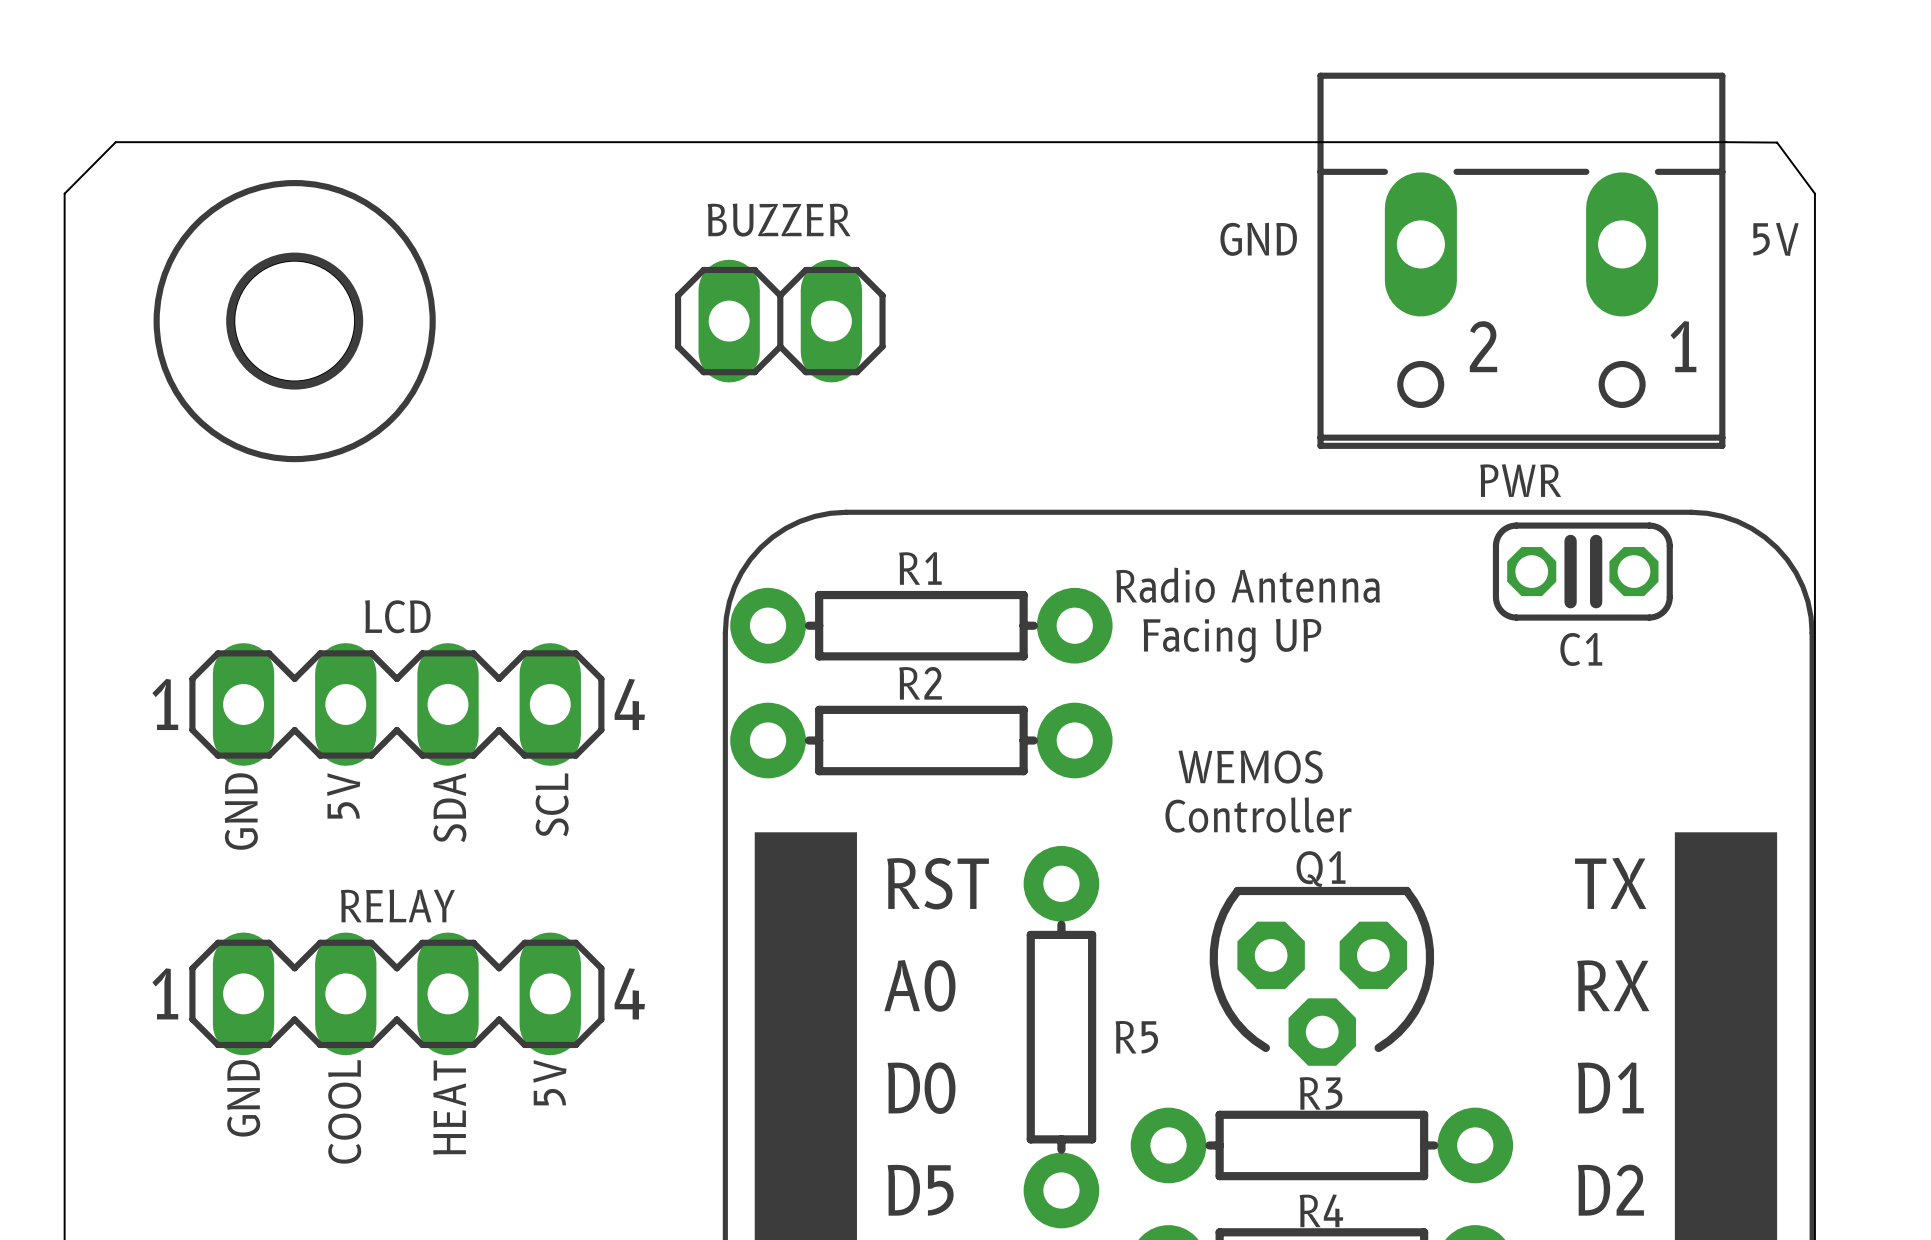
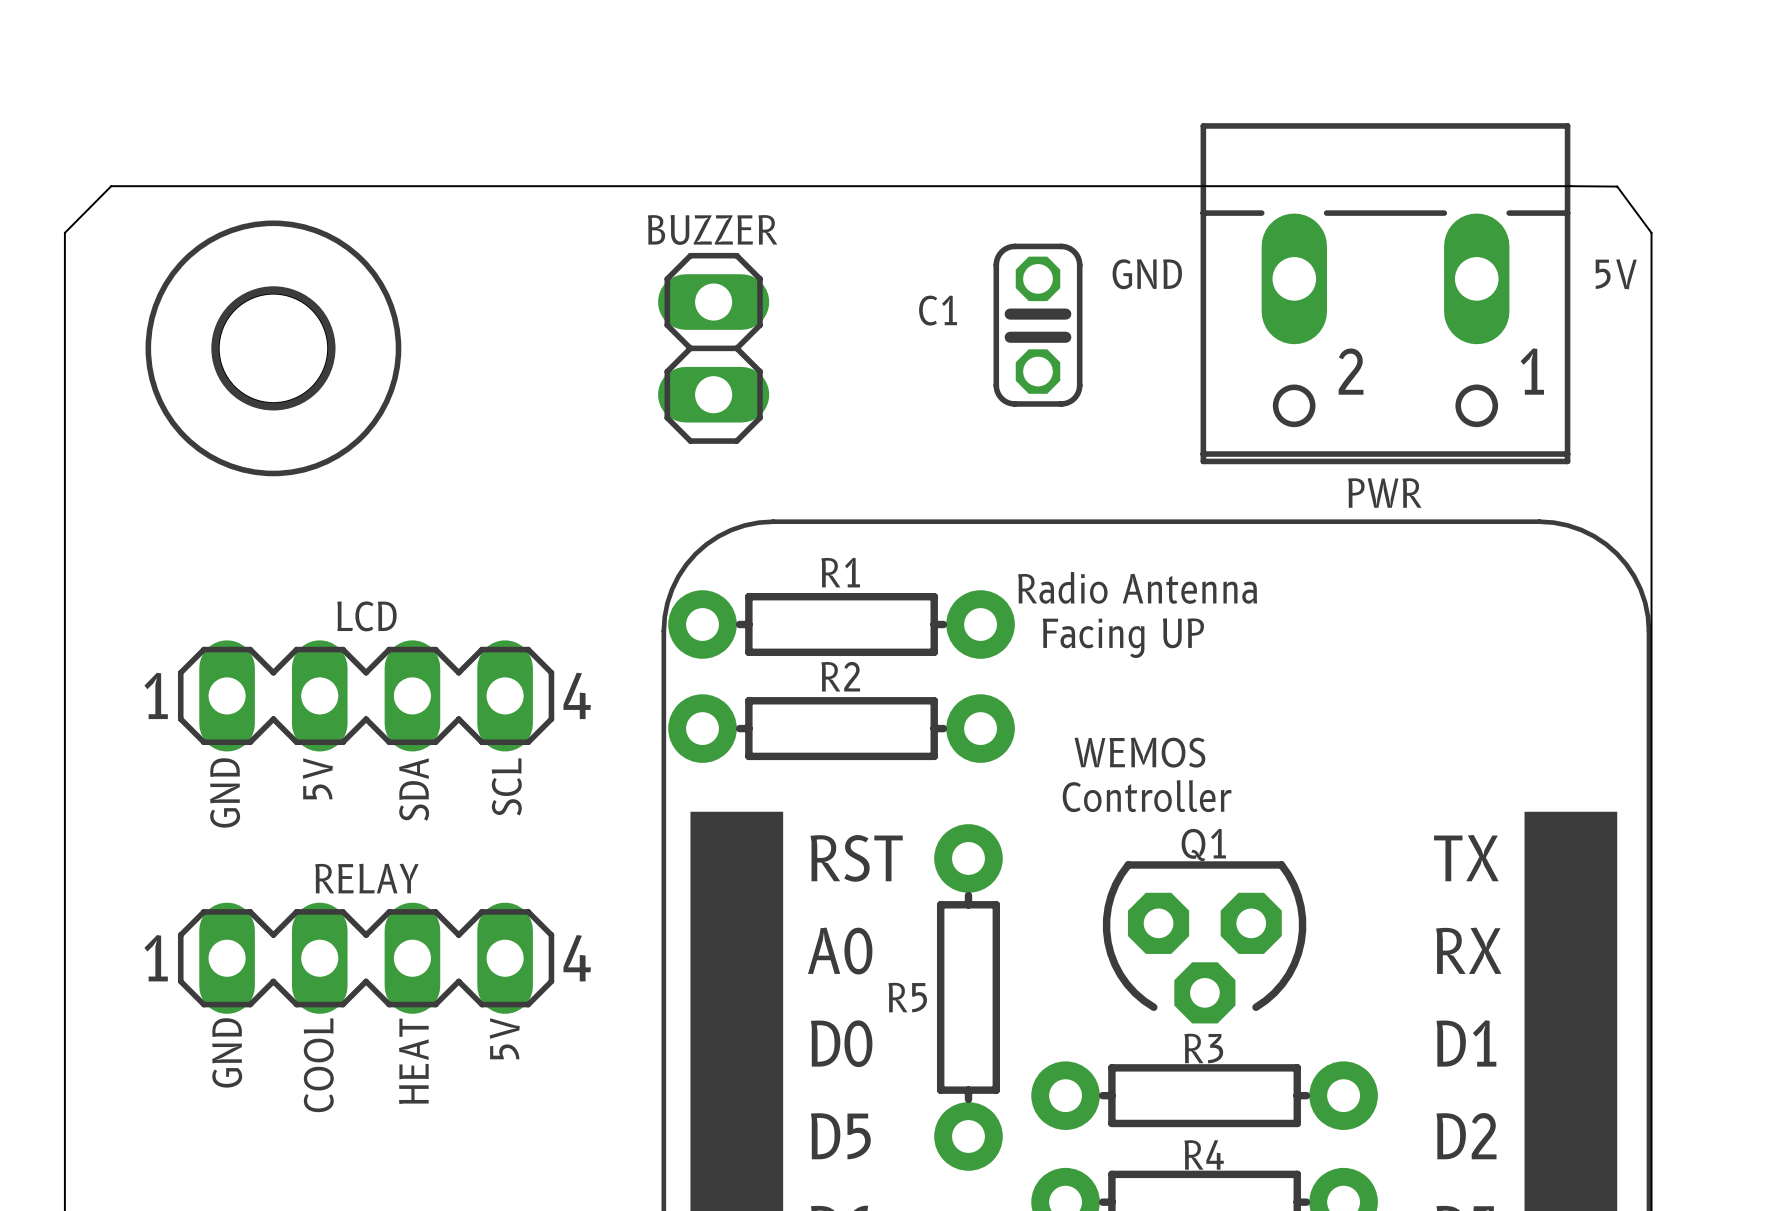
BUZZER rotation: 0° (780, 321) -> 90° clockwise (713, 348)
C1 rotation: 0° (1582, 571) -> 90° clockwise (1037, 325)
C1 position: (1582, 571) -> (1037, 325)
R5 name position: R5 (1136, 1037) -> R5 (907, 997)

